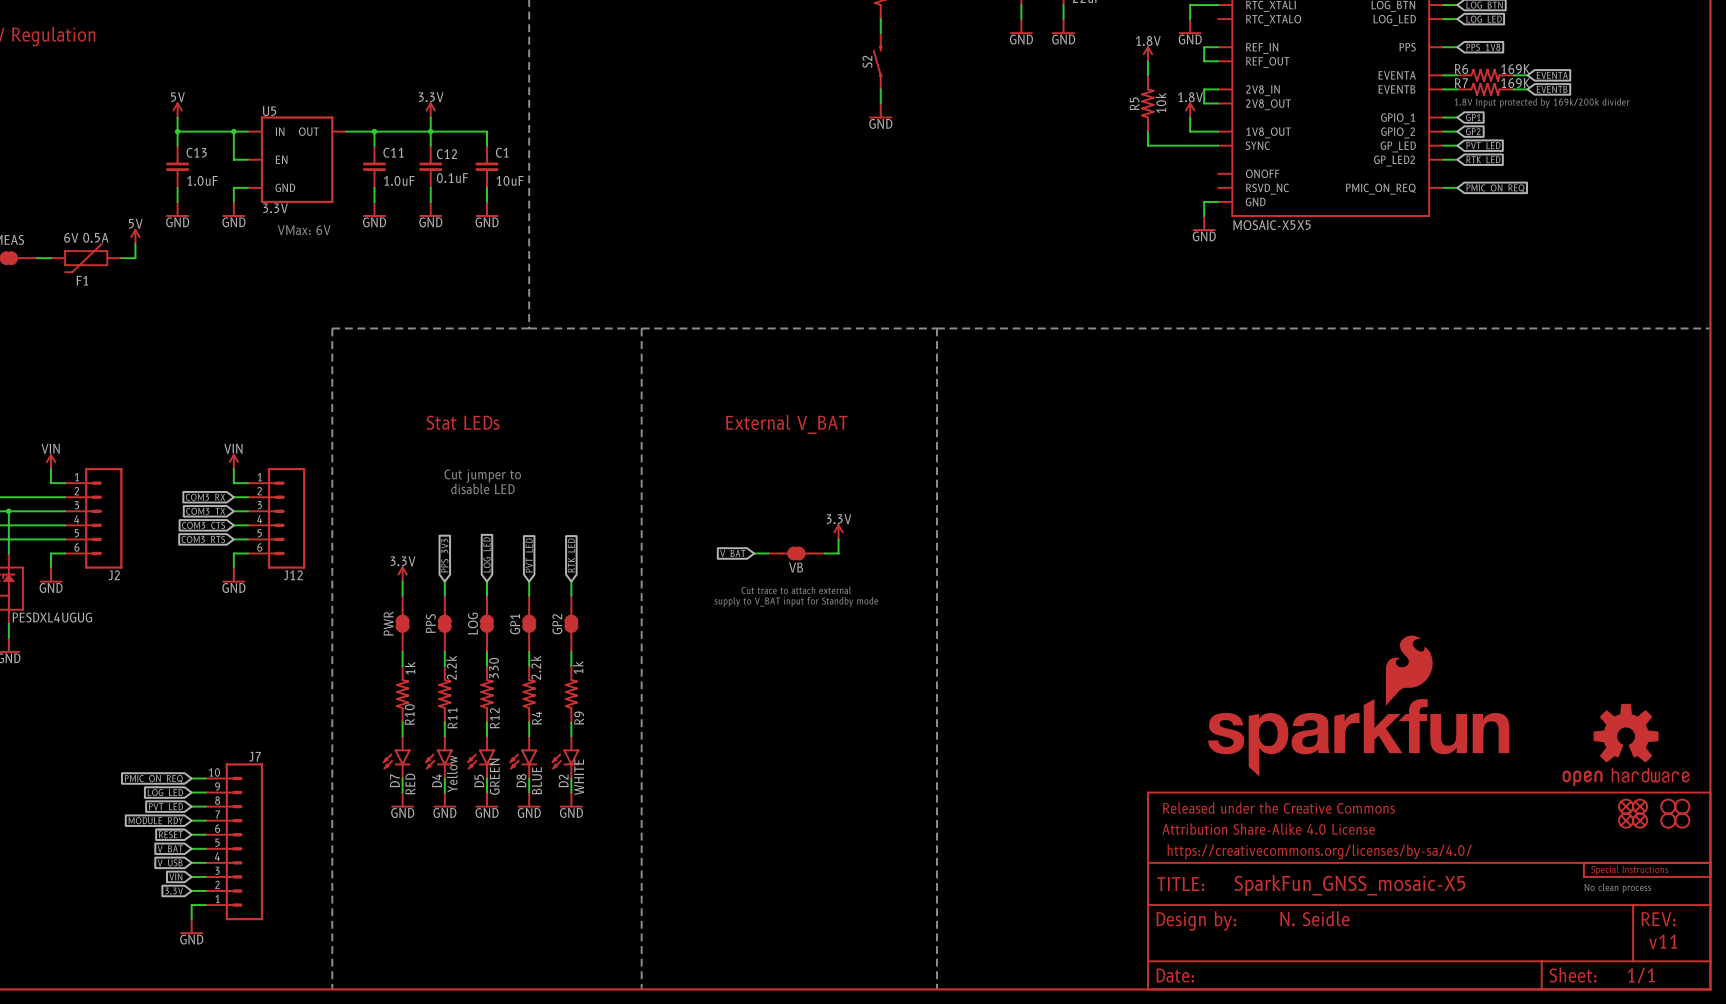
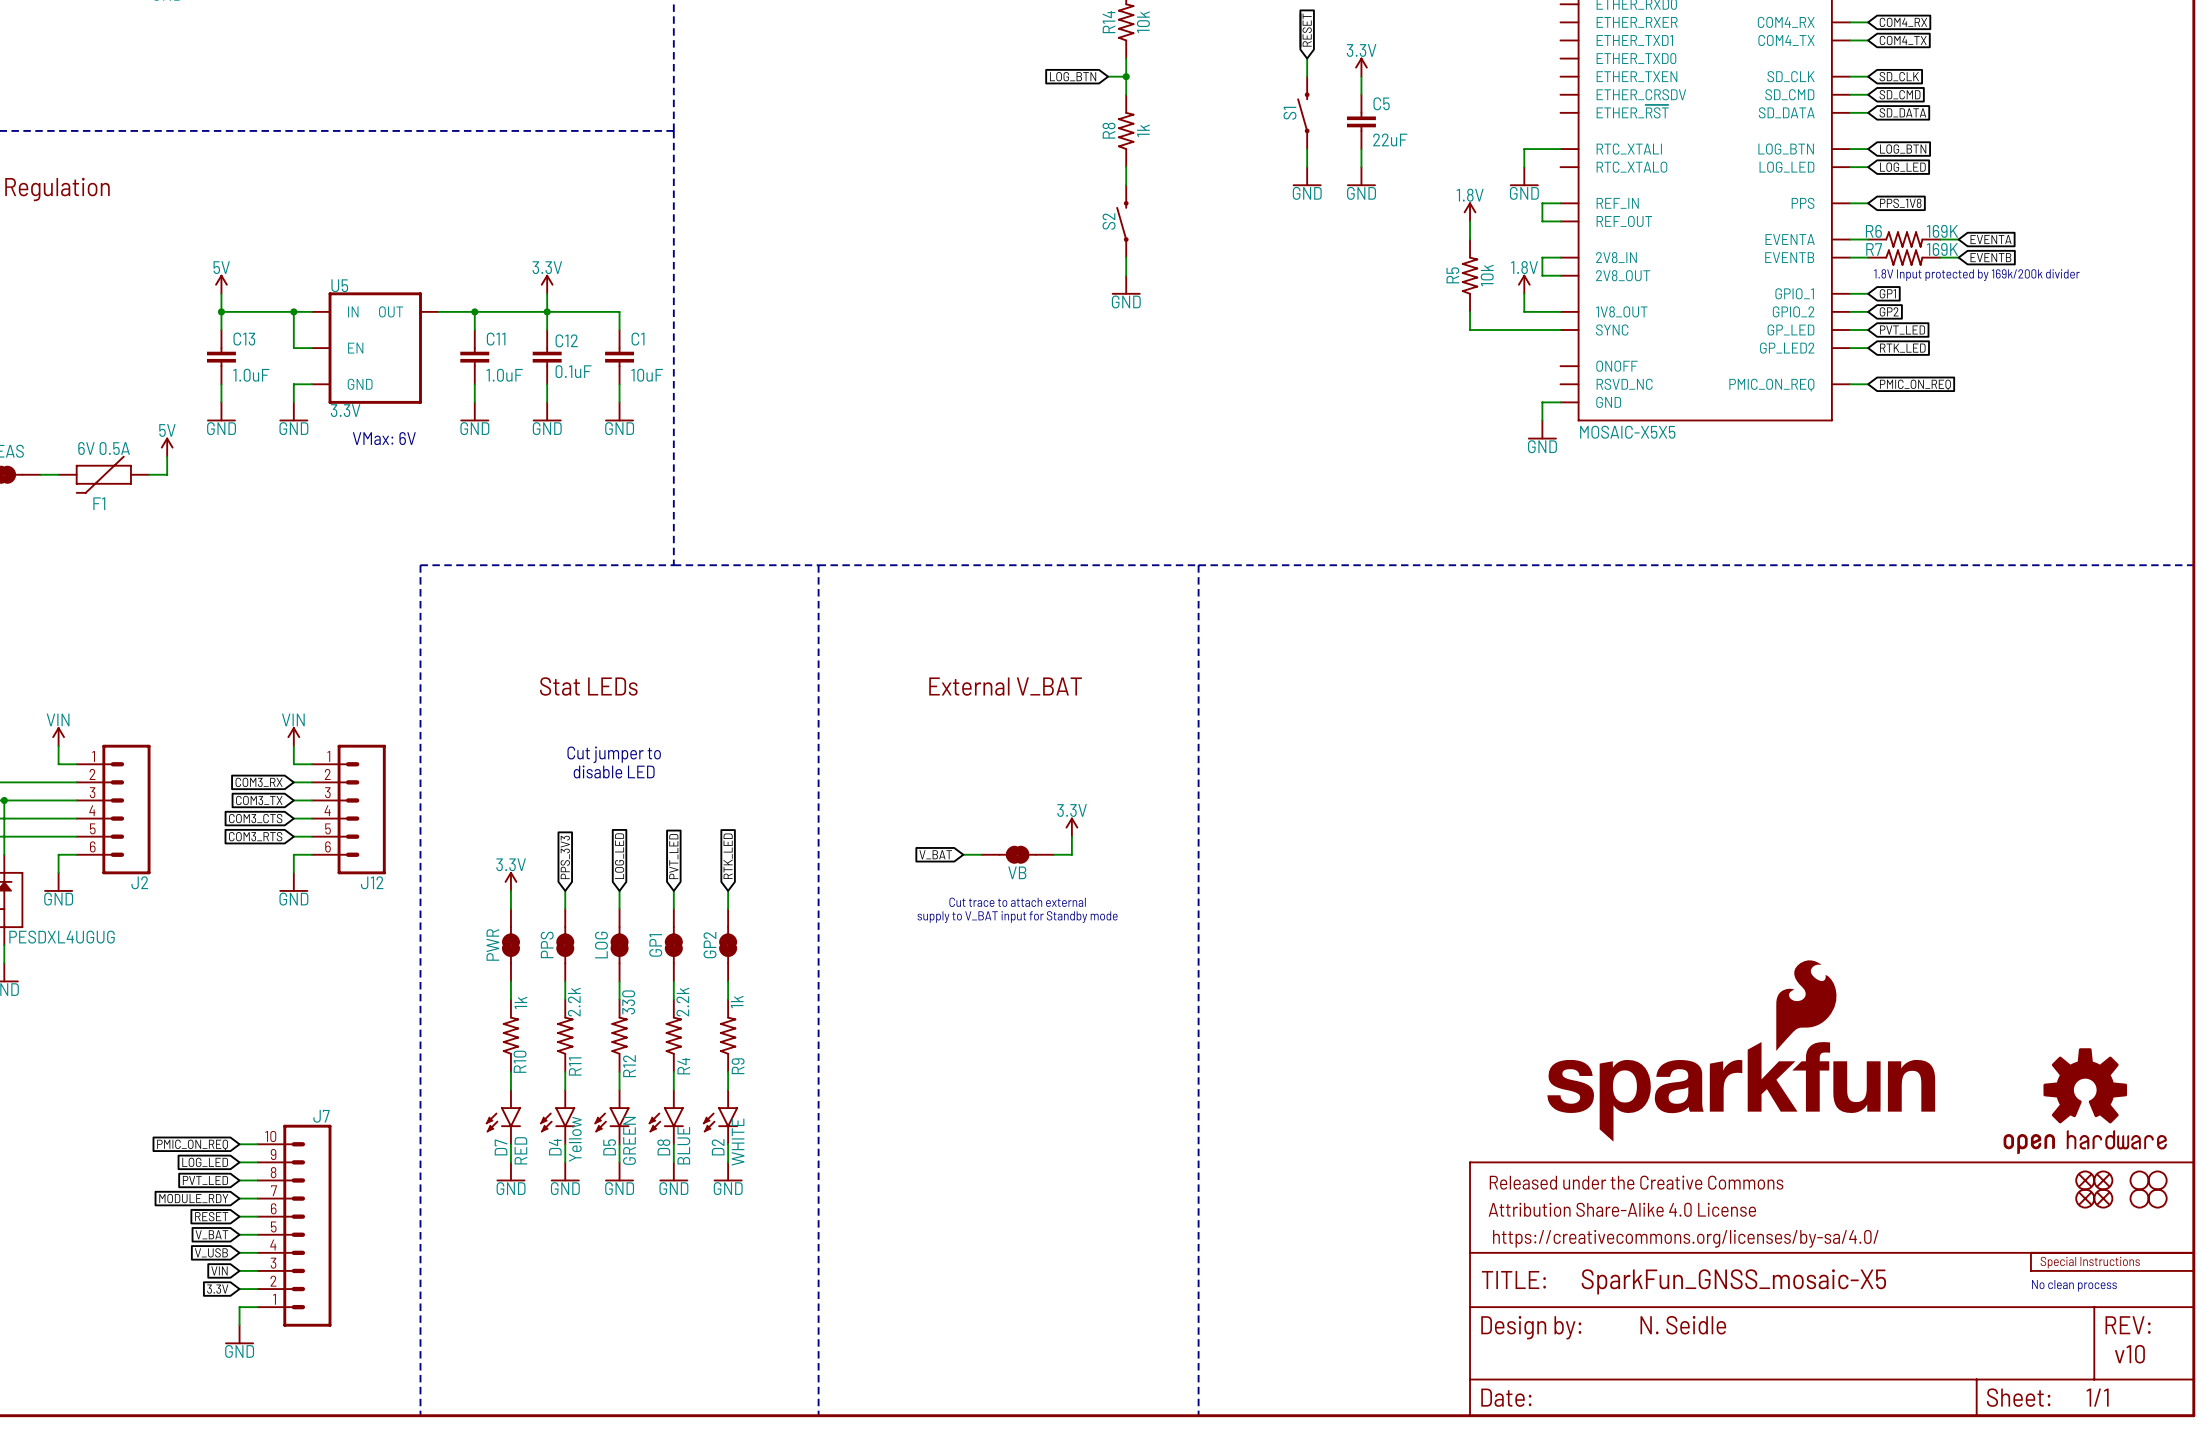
text: v11 (1663, 941) -> v10 (2129, 1354)

